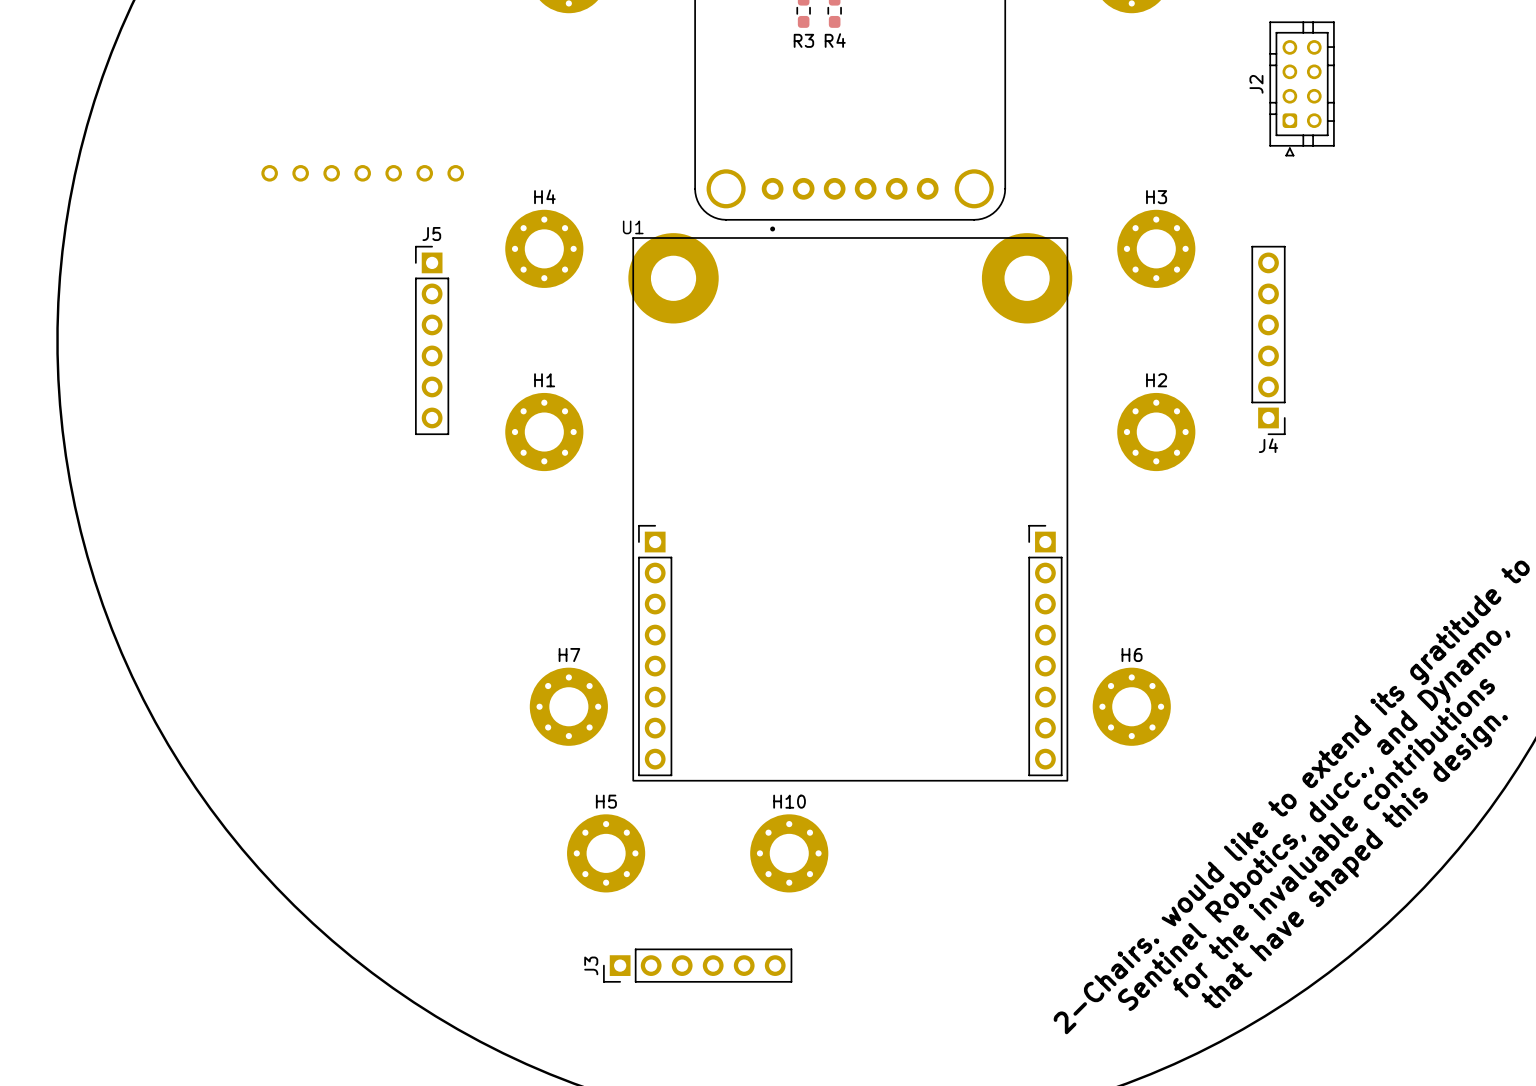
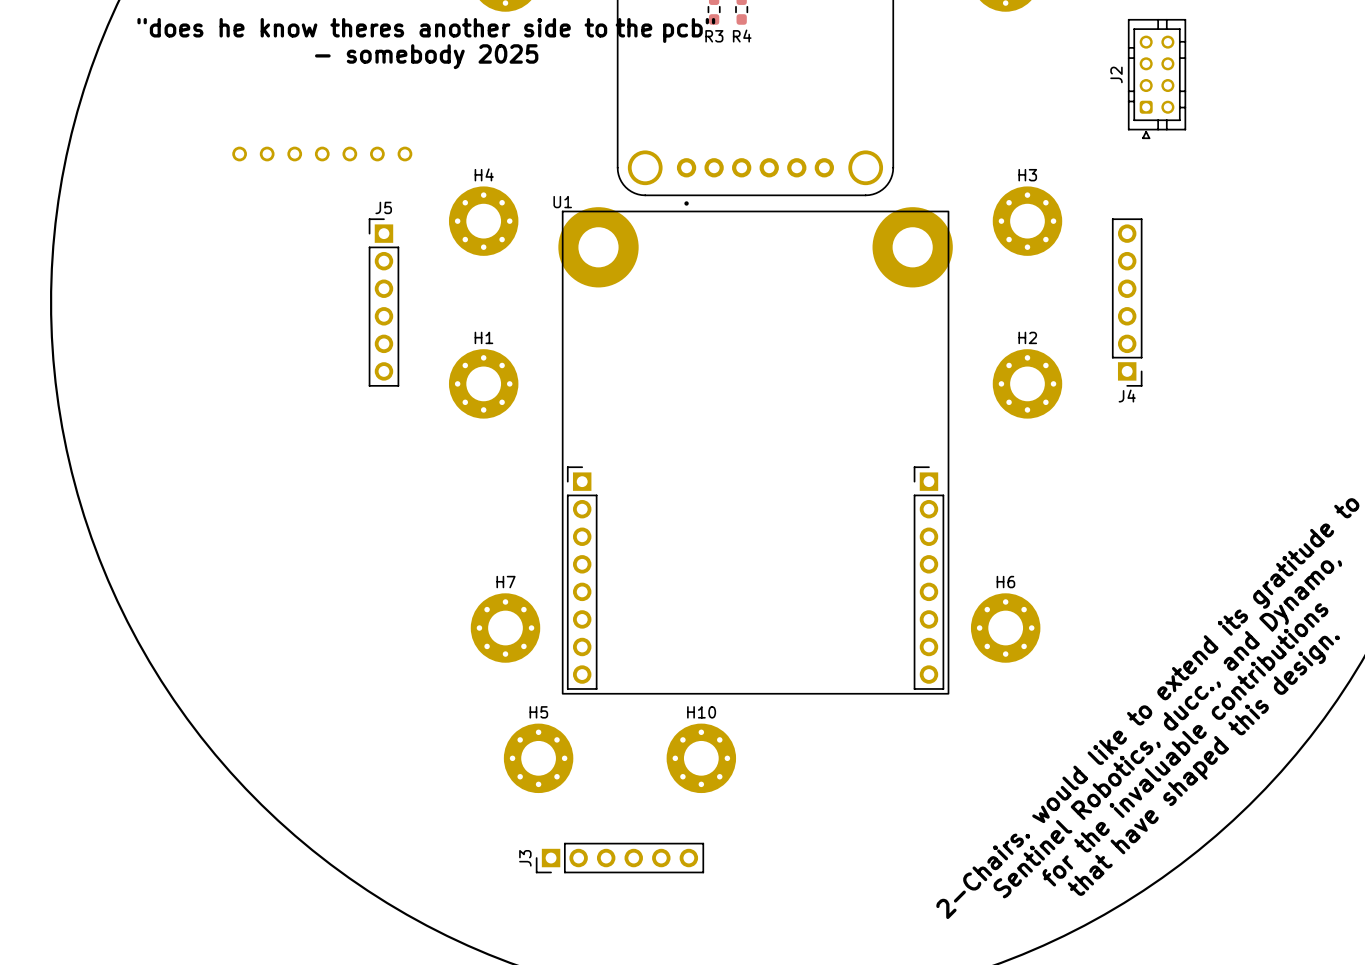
text: none -> "does he know theres another side to the pcb" (426, 30)
text: none -> - somebody 2025 (426, 56)

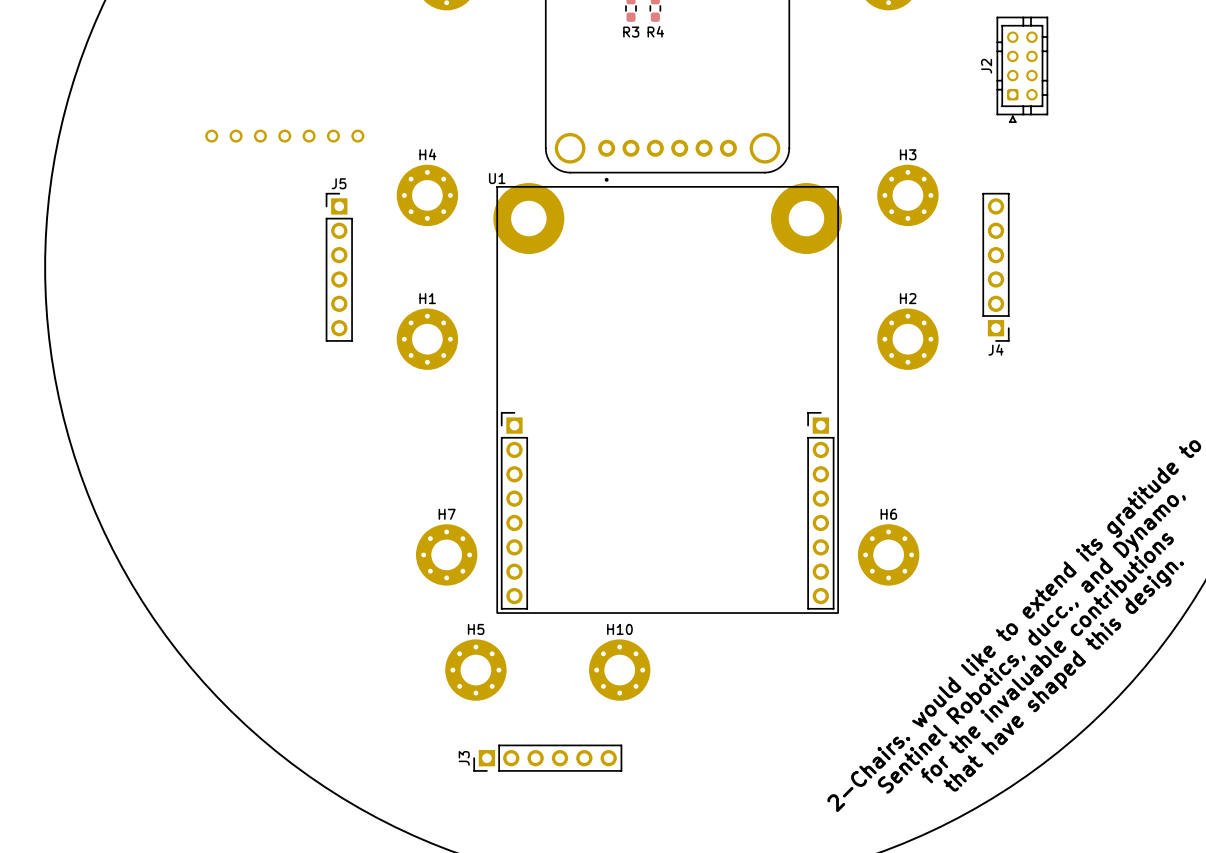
text: "does he know theres another side to the pcb" (426, 30) -> none
text: - somebody 2025 (426, 56) -> none

